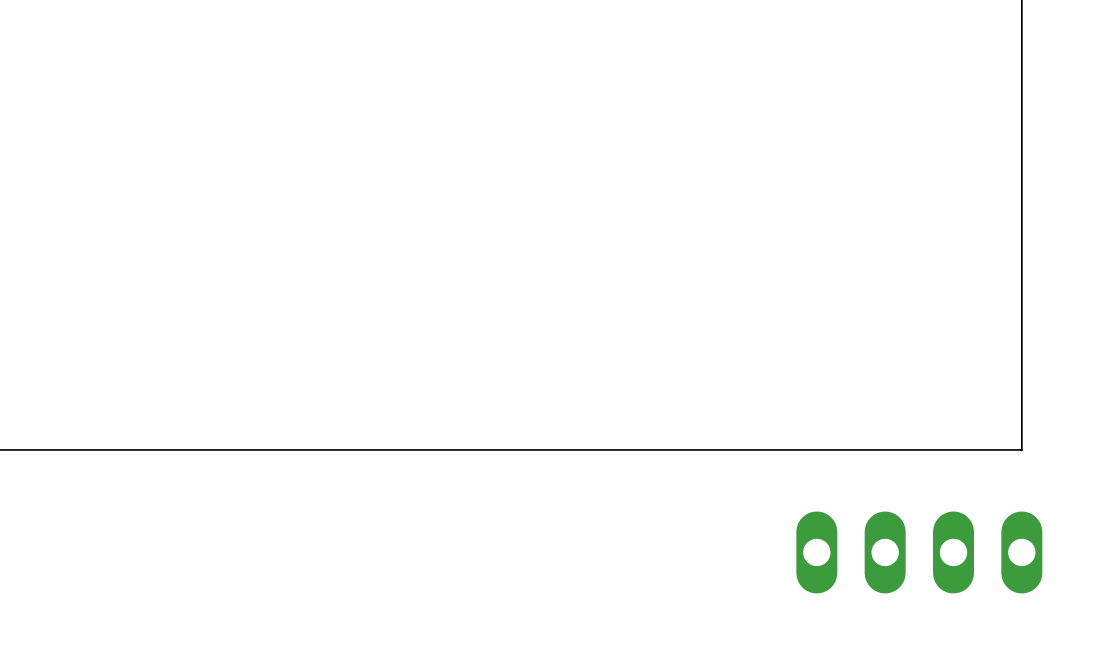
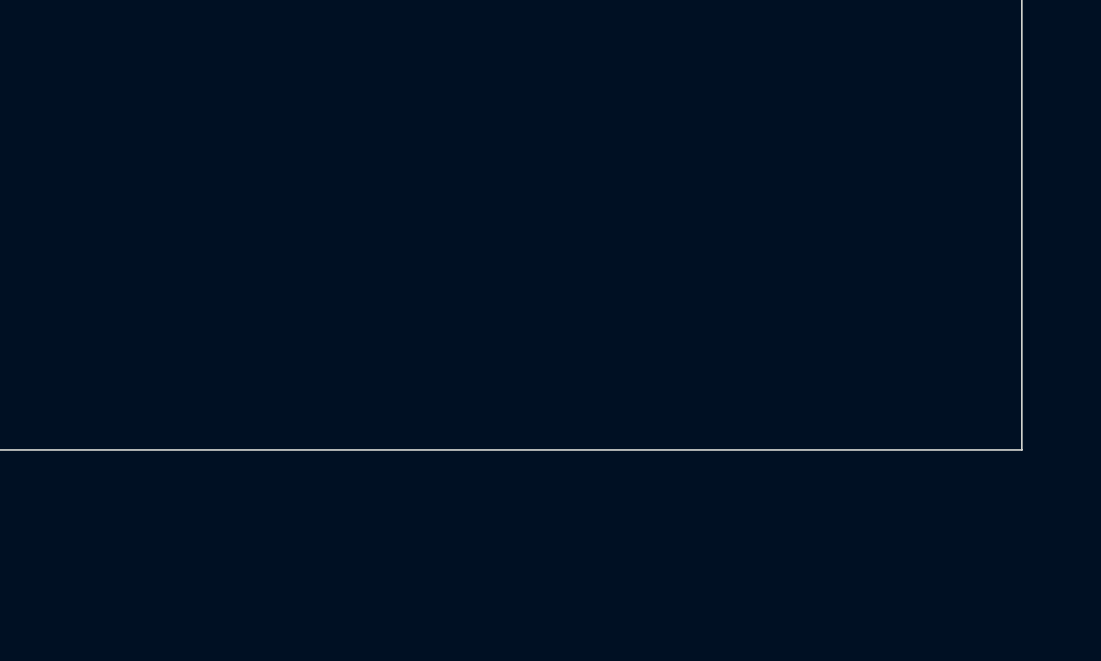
part: (919, 552) -> none

